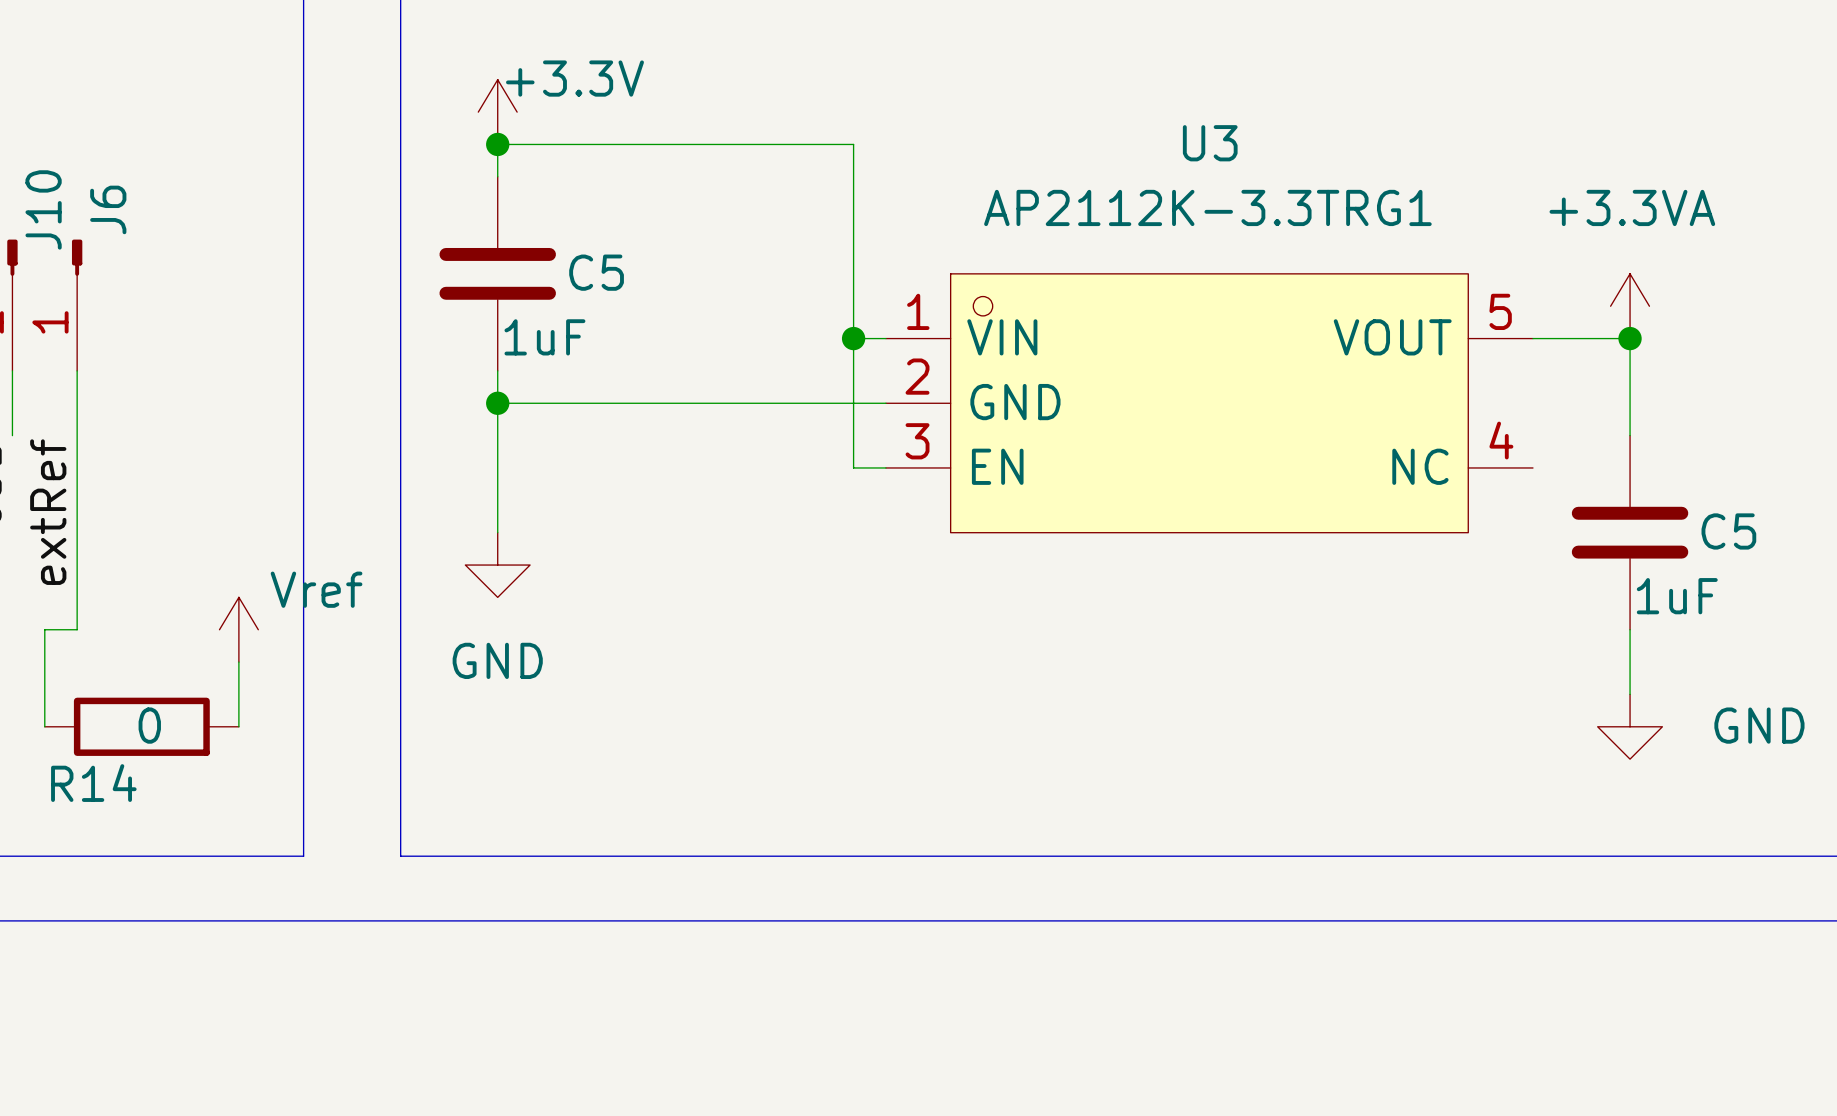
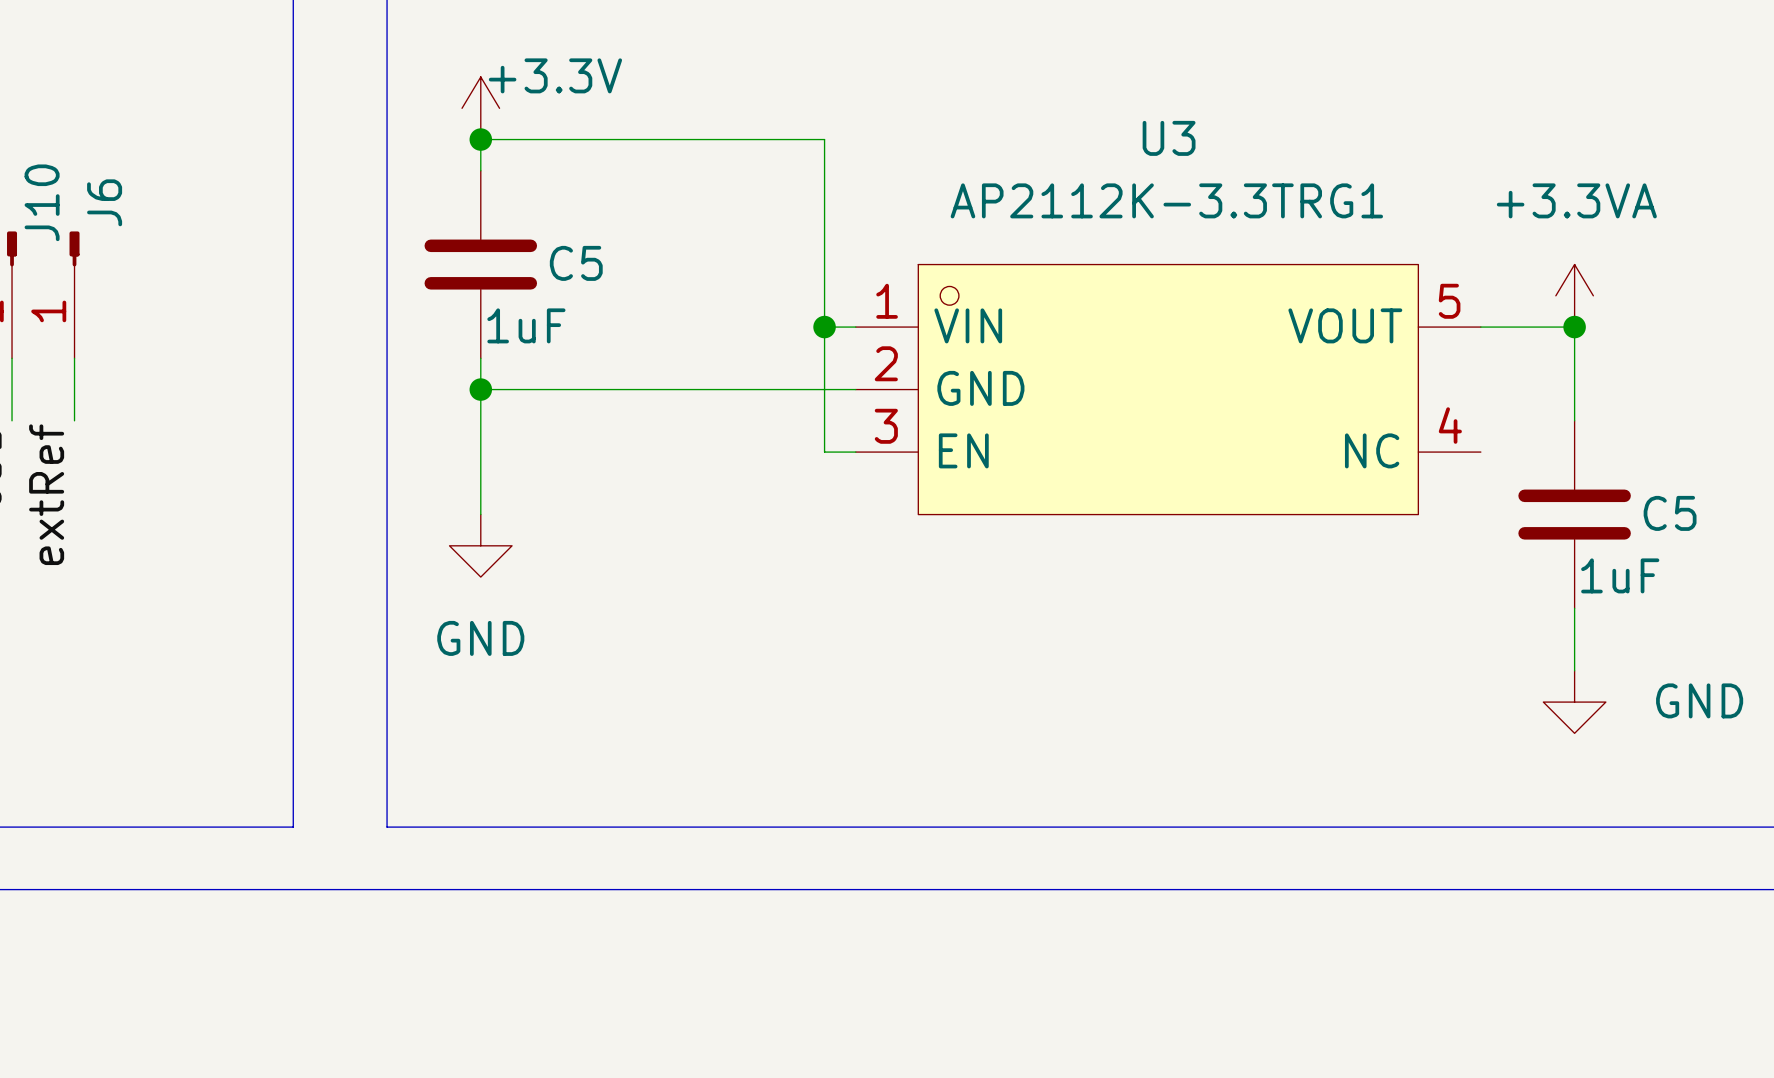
wire: (77, 435) (77, 629) (44, 629) (44, 726) -> none
power symbol: Vref (238, 629) -> none
wire: (238, 662) (238, 726) -> none
R14: 0 (141, 726) -> none

